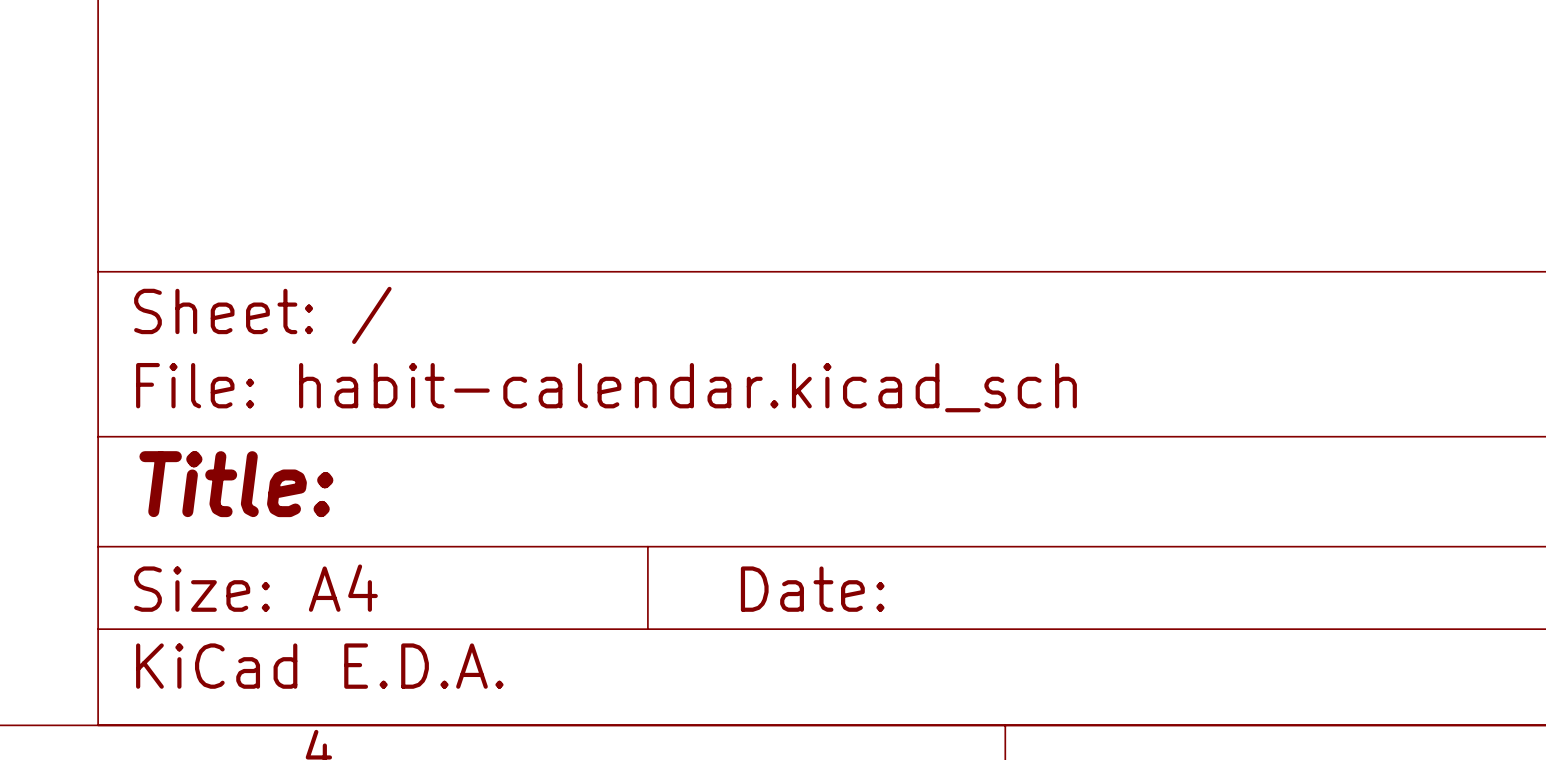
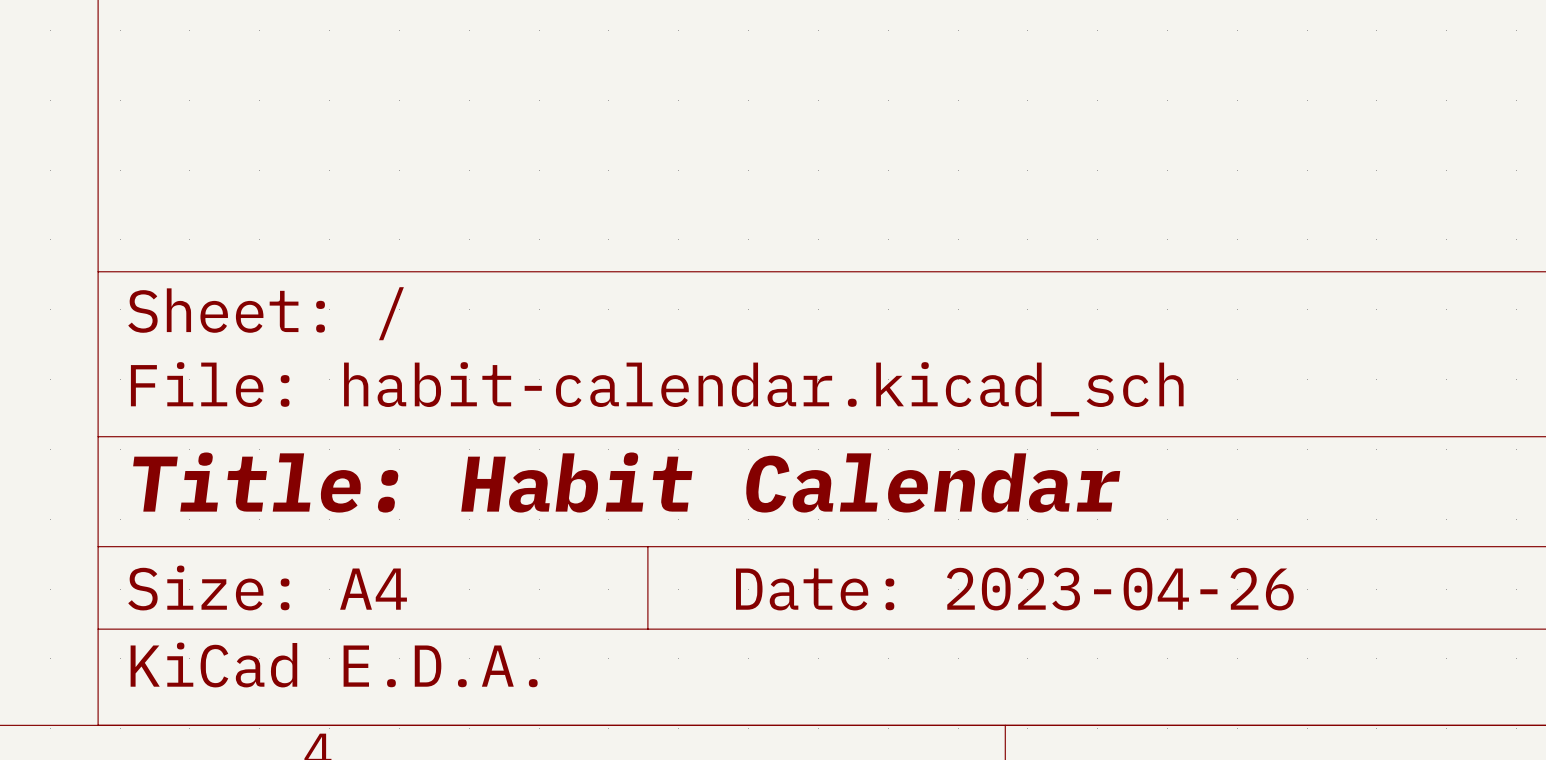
title block: Title: (236, 484) -> Title: Habit Calendar (626, 482)
title block: Date: (812, 589) -> Date: 2023-04-26 (1014, 589)

